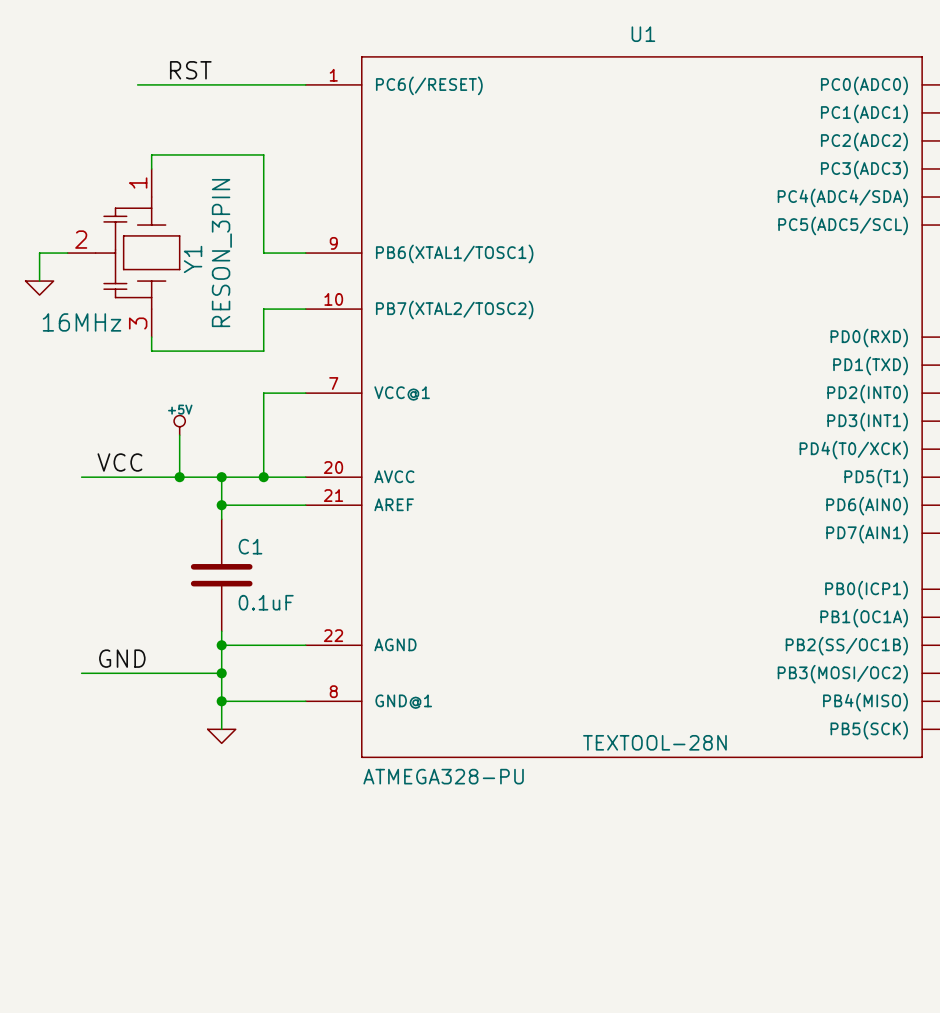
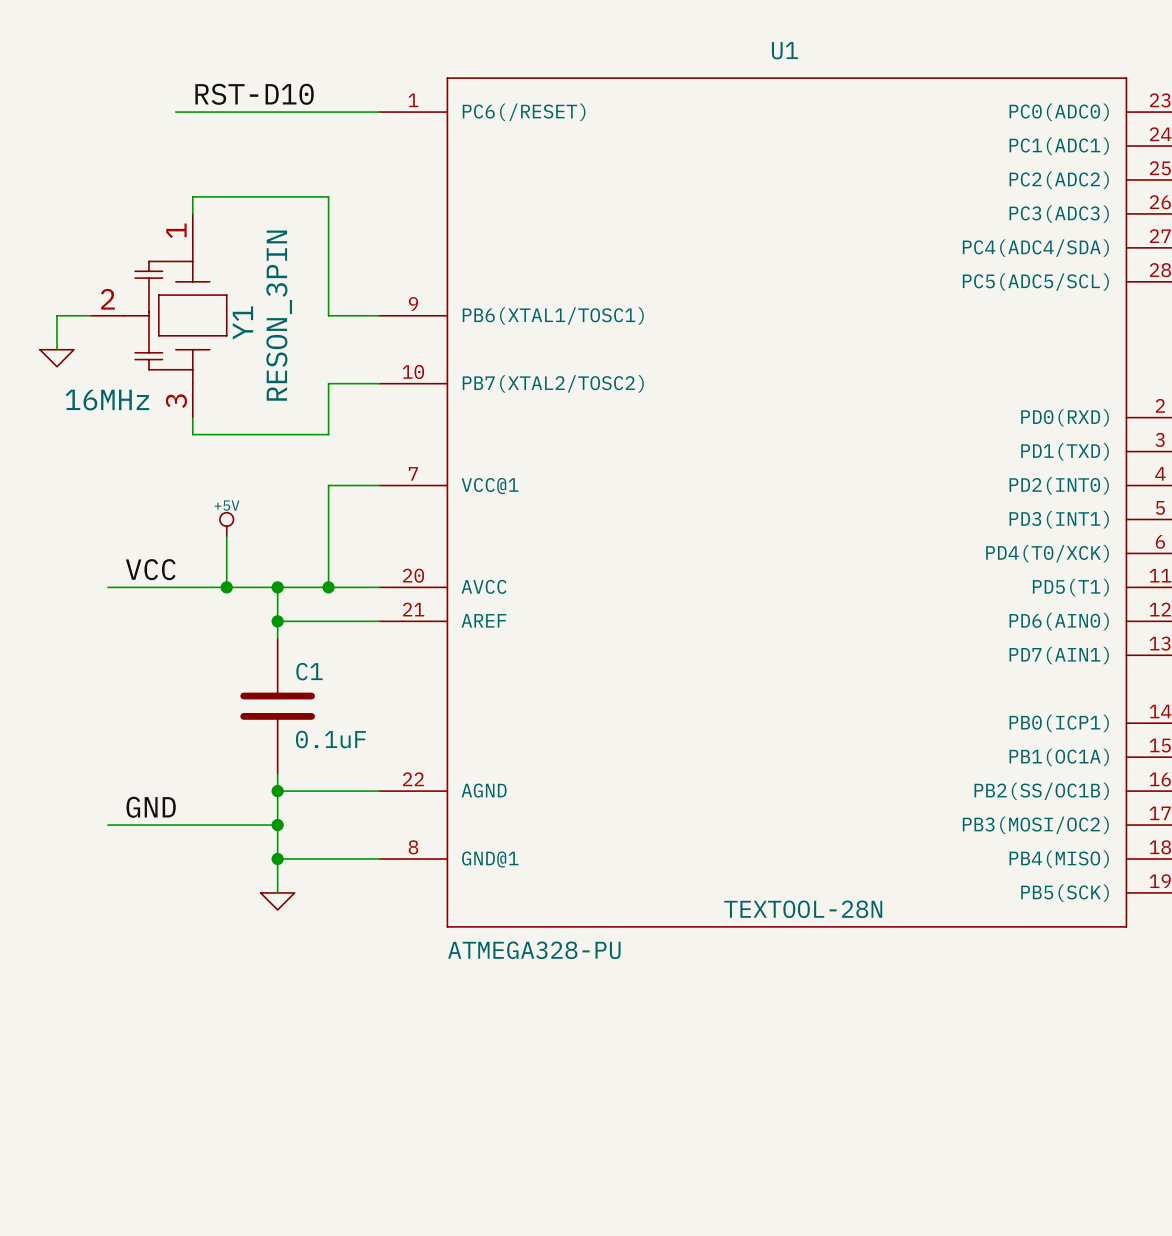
label: RST (190, 70) -> none
label: none -> RST-D10 (254, 94)

